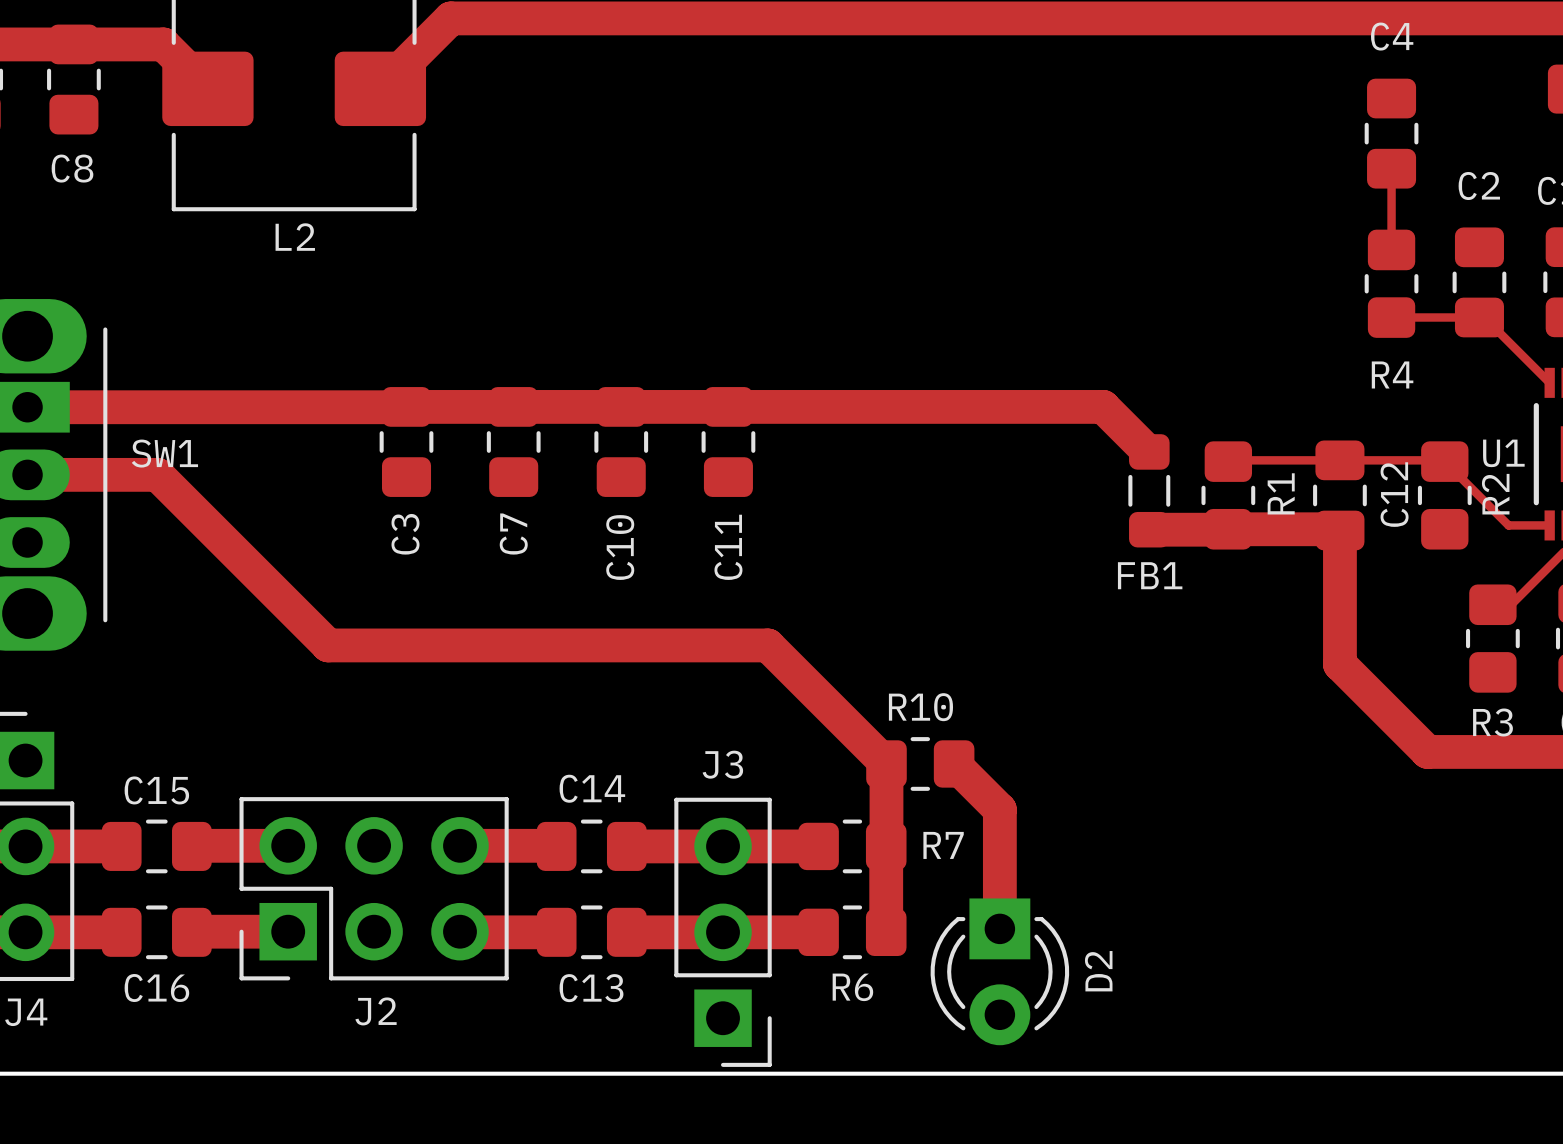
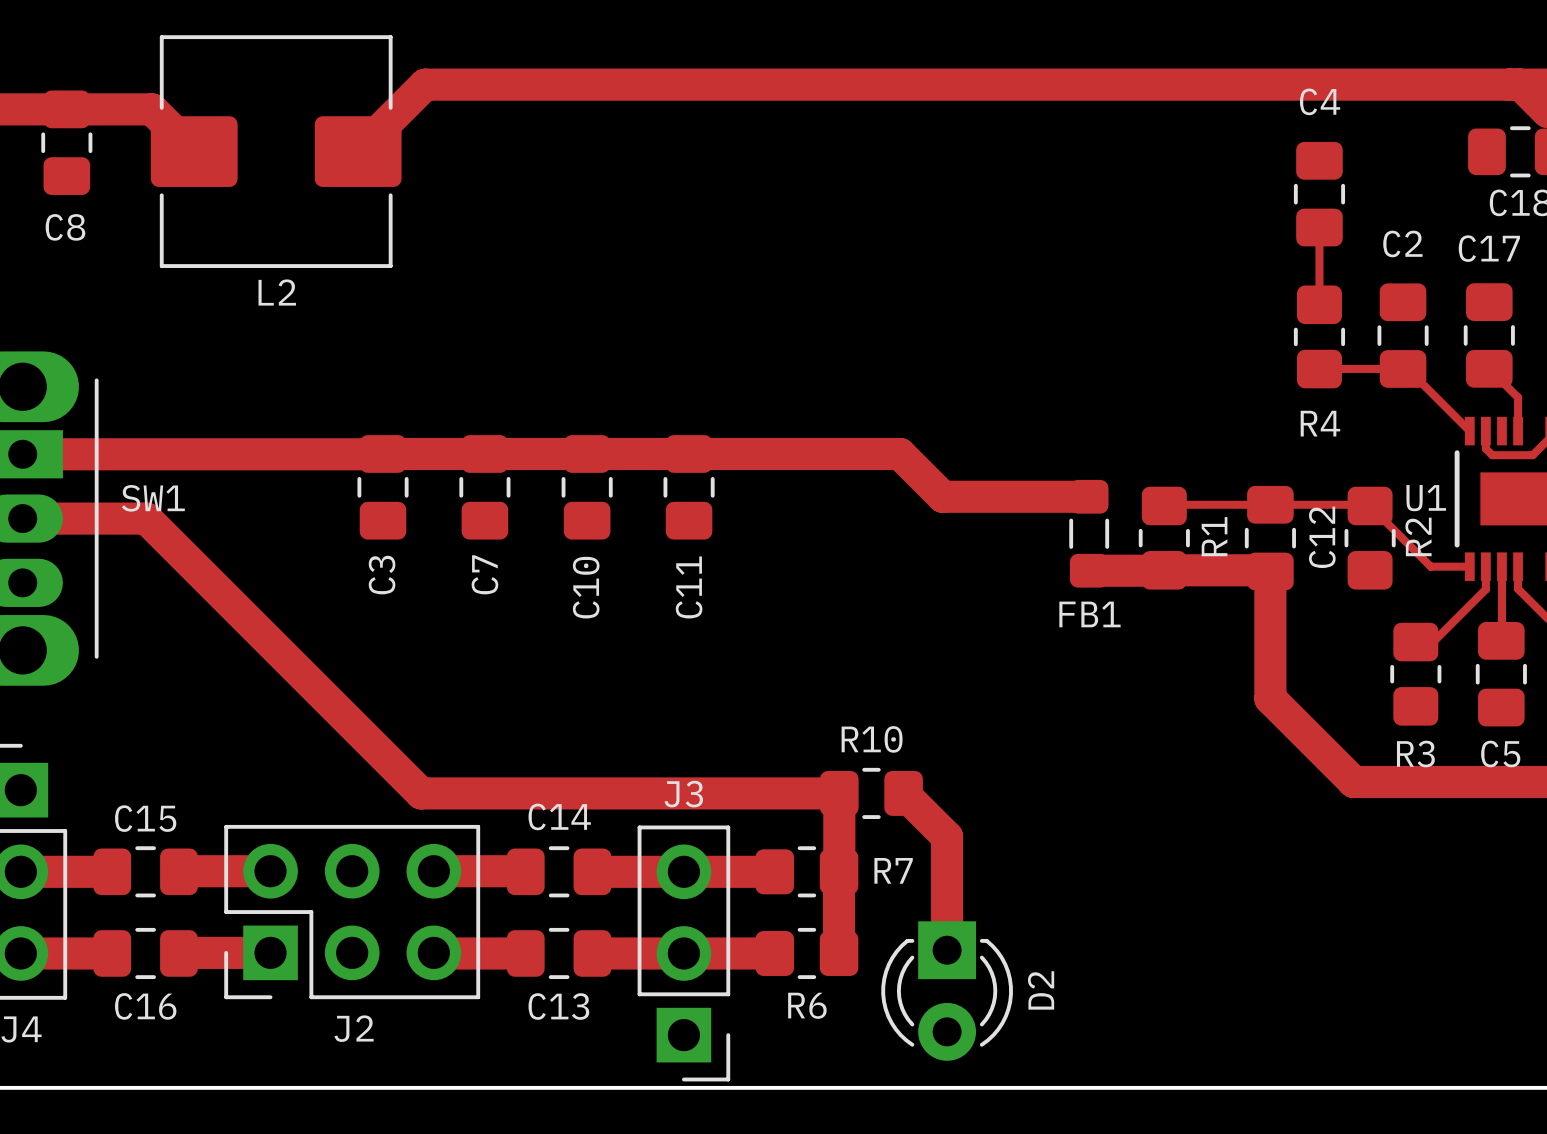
top track: (950, 406) (1103, 406) (1148, 451) -> (899, 453) (942, 496) (1088, 496)
top track: (328, 645) (767, 645) (886, 763) -> (308, 680) (421, 793) (839, 793)

